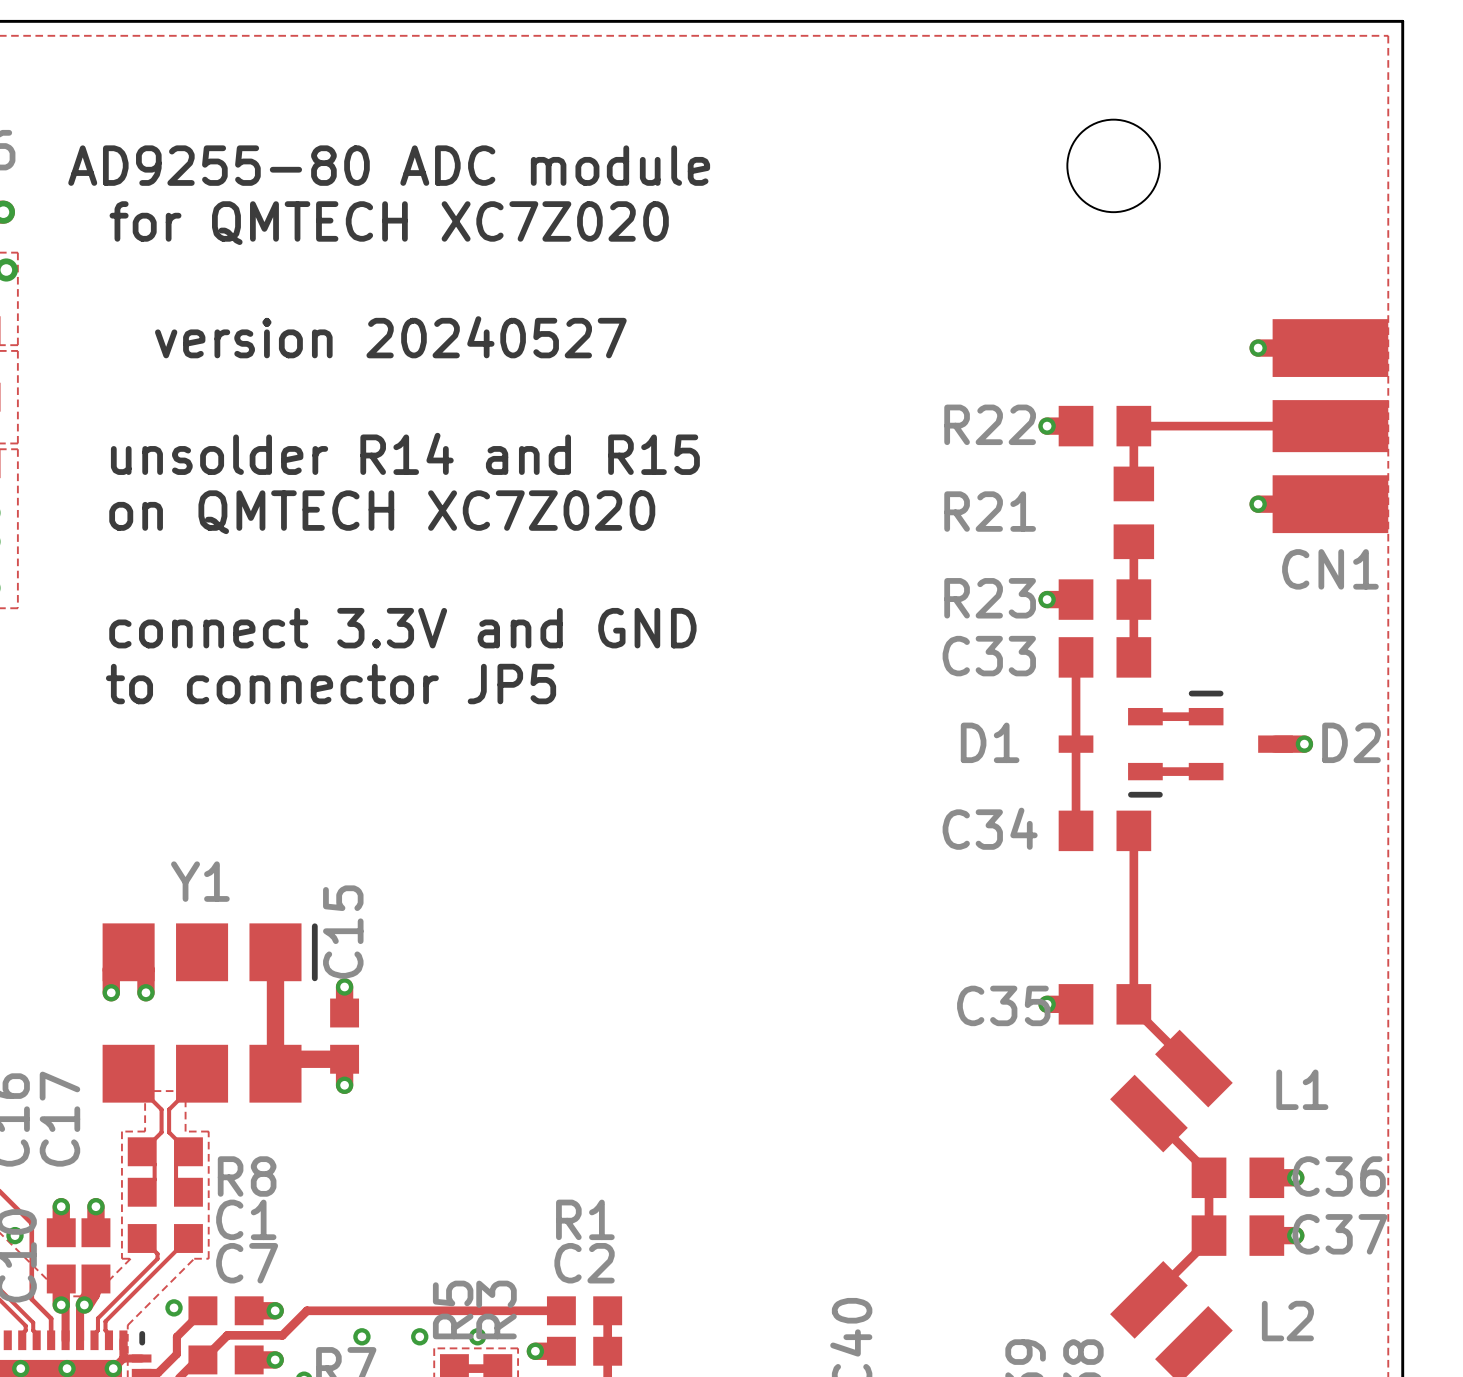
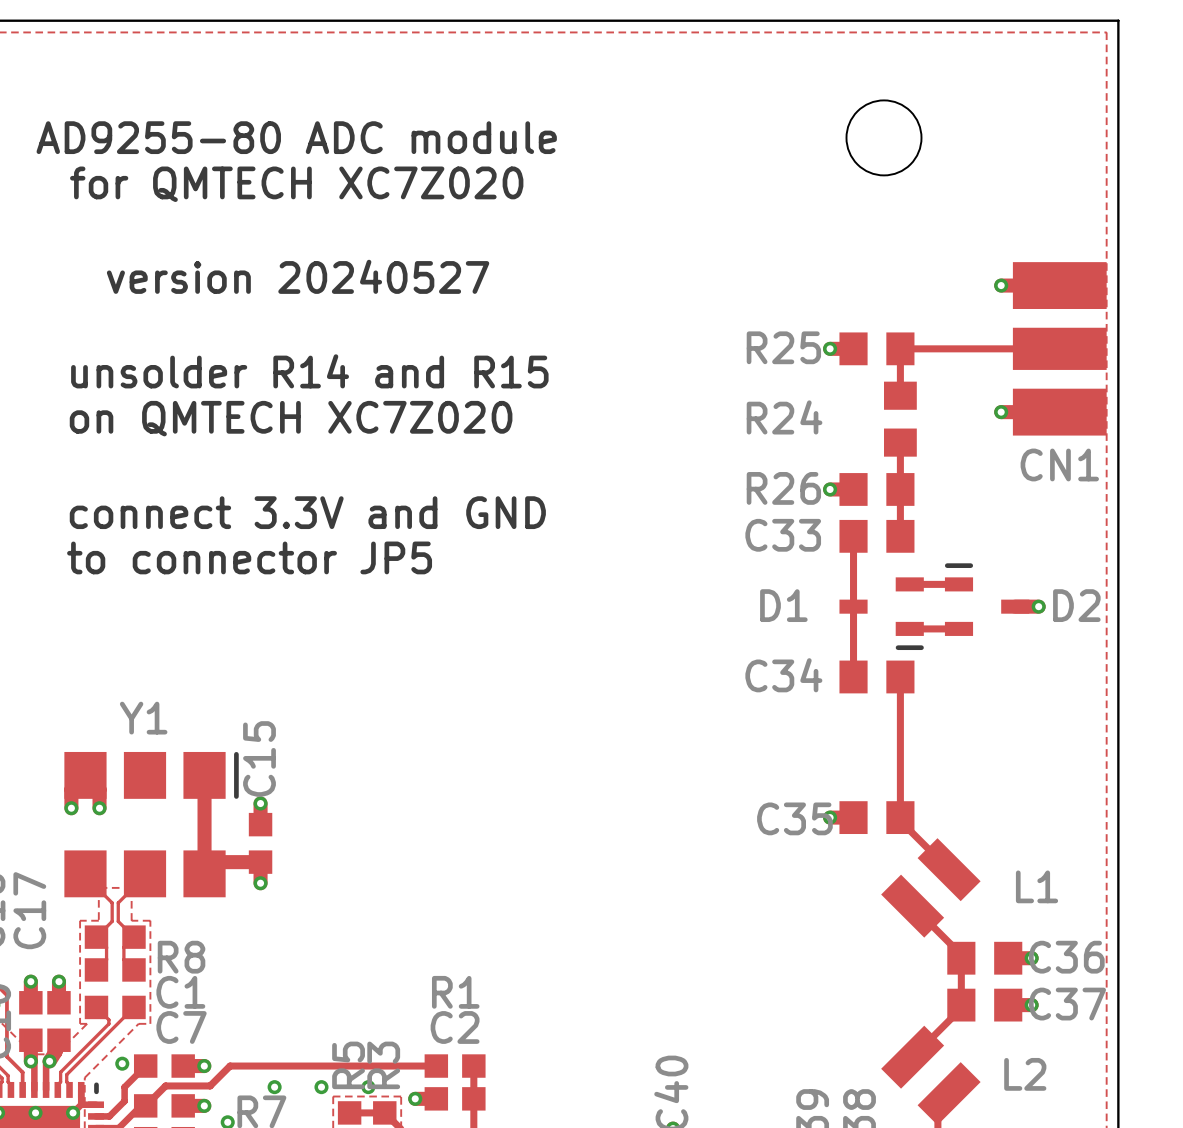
R22 name: R22 (990, 424) -> R25 (783, 347)
R21 name: R21 (990, 511) -> R24 (784, 417)
R23 name: R23 (990, 598) -> R26 (783, 488)

